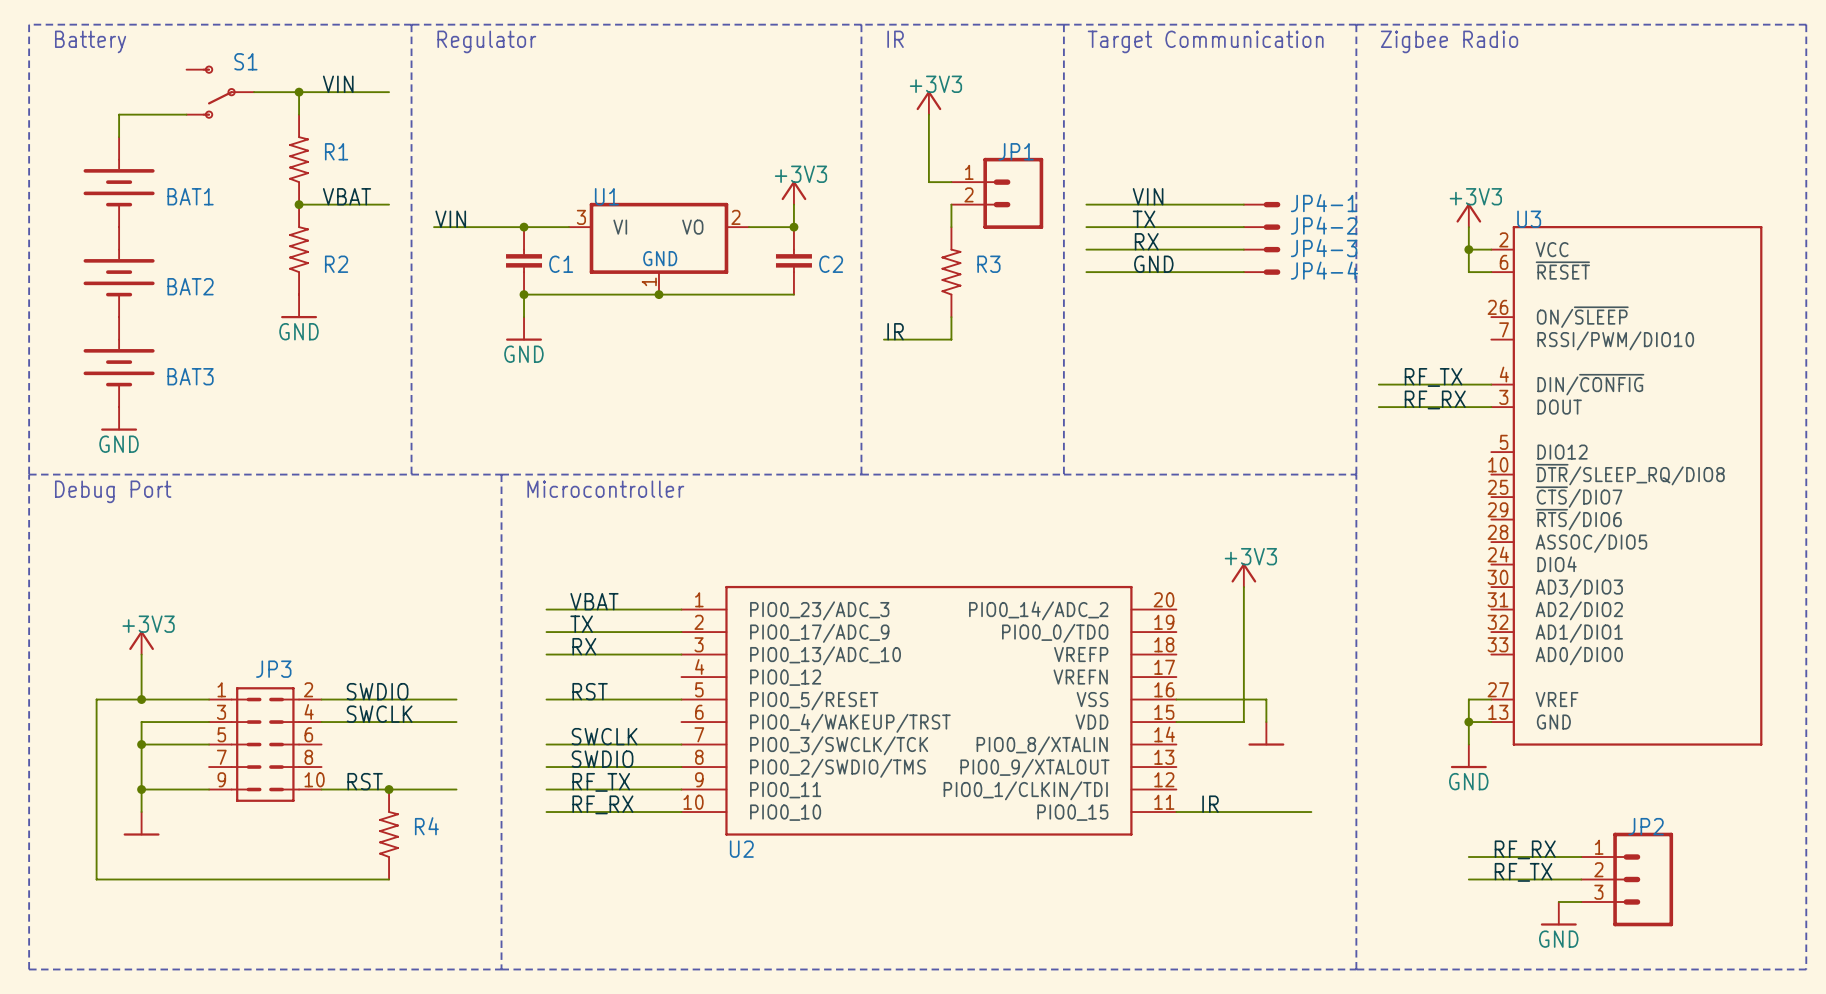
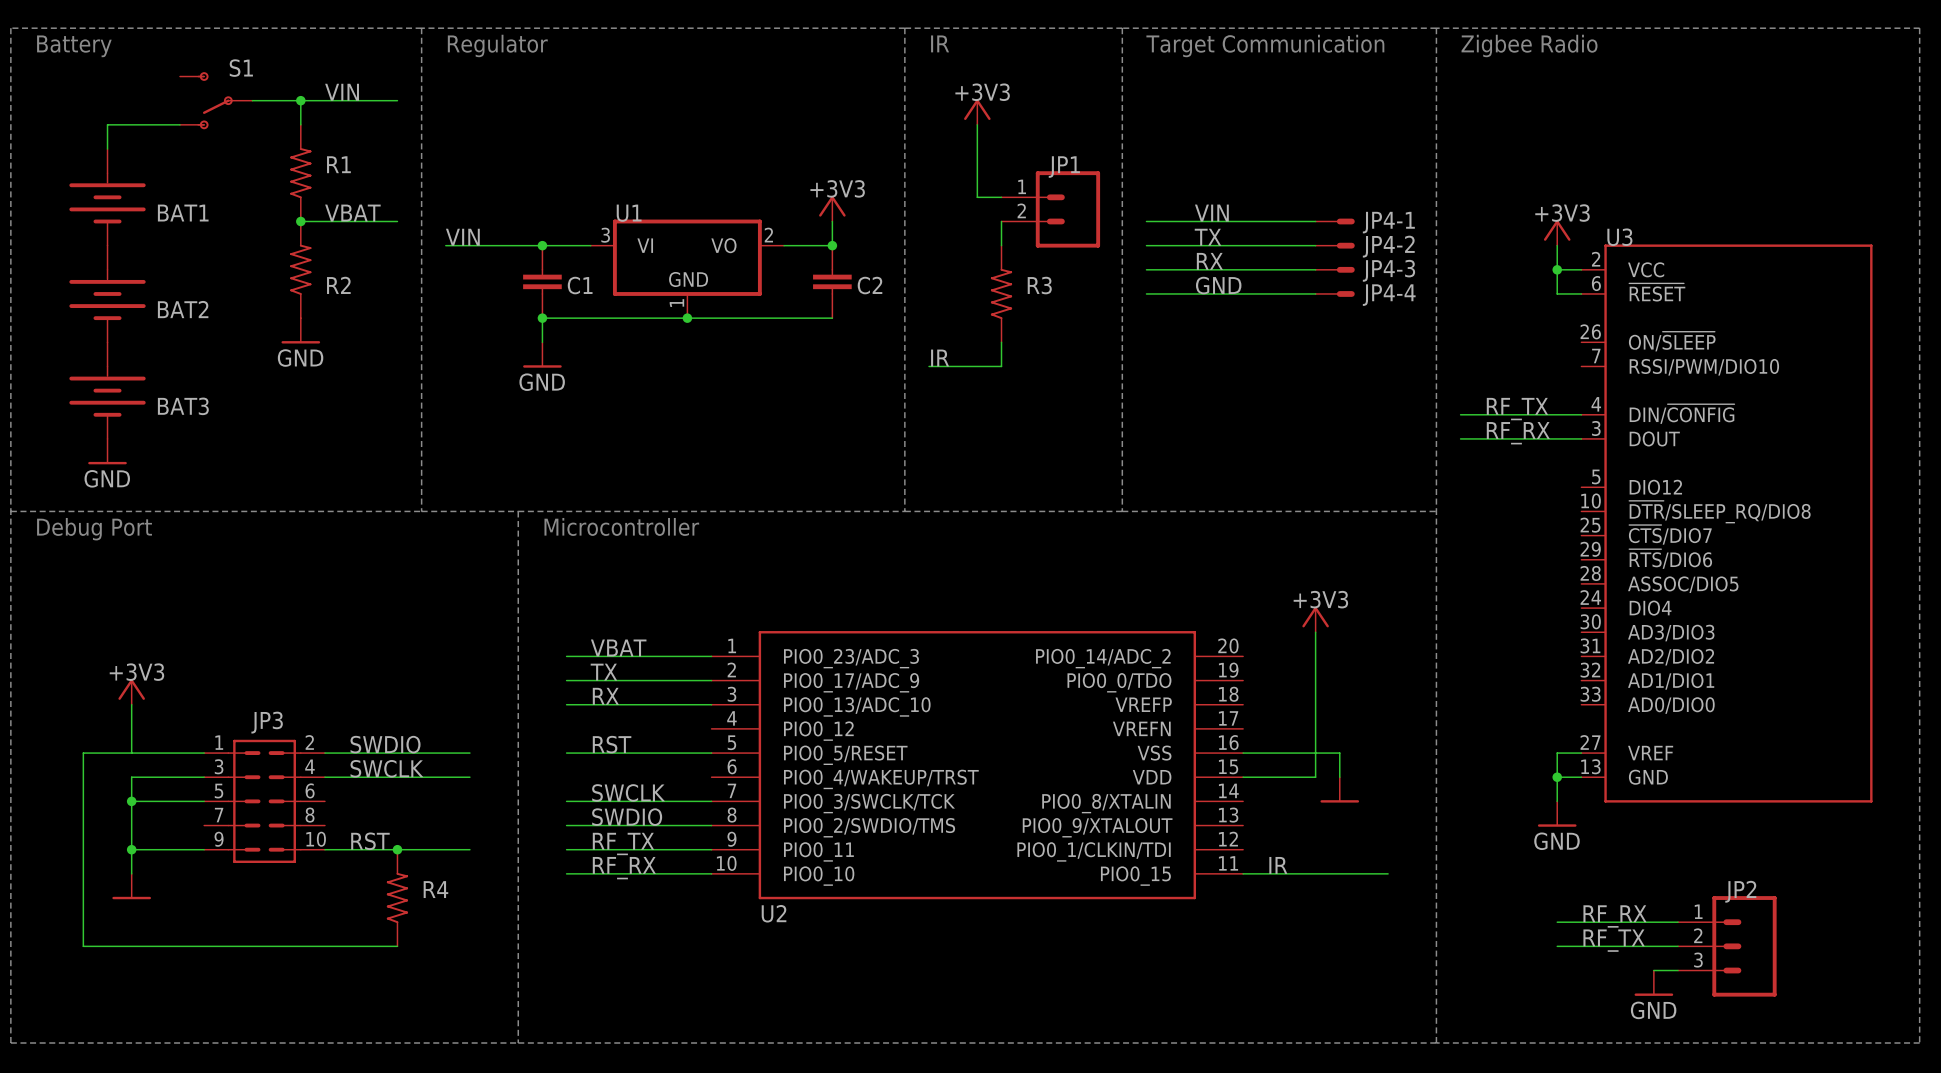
junction: (141, 699) -> none

